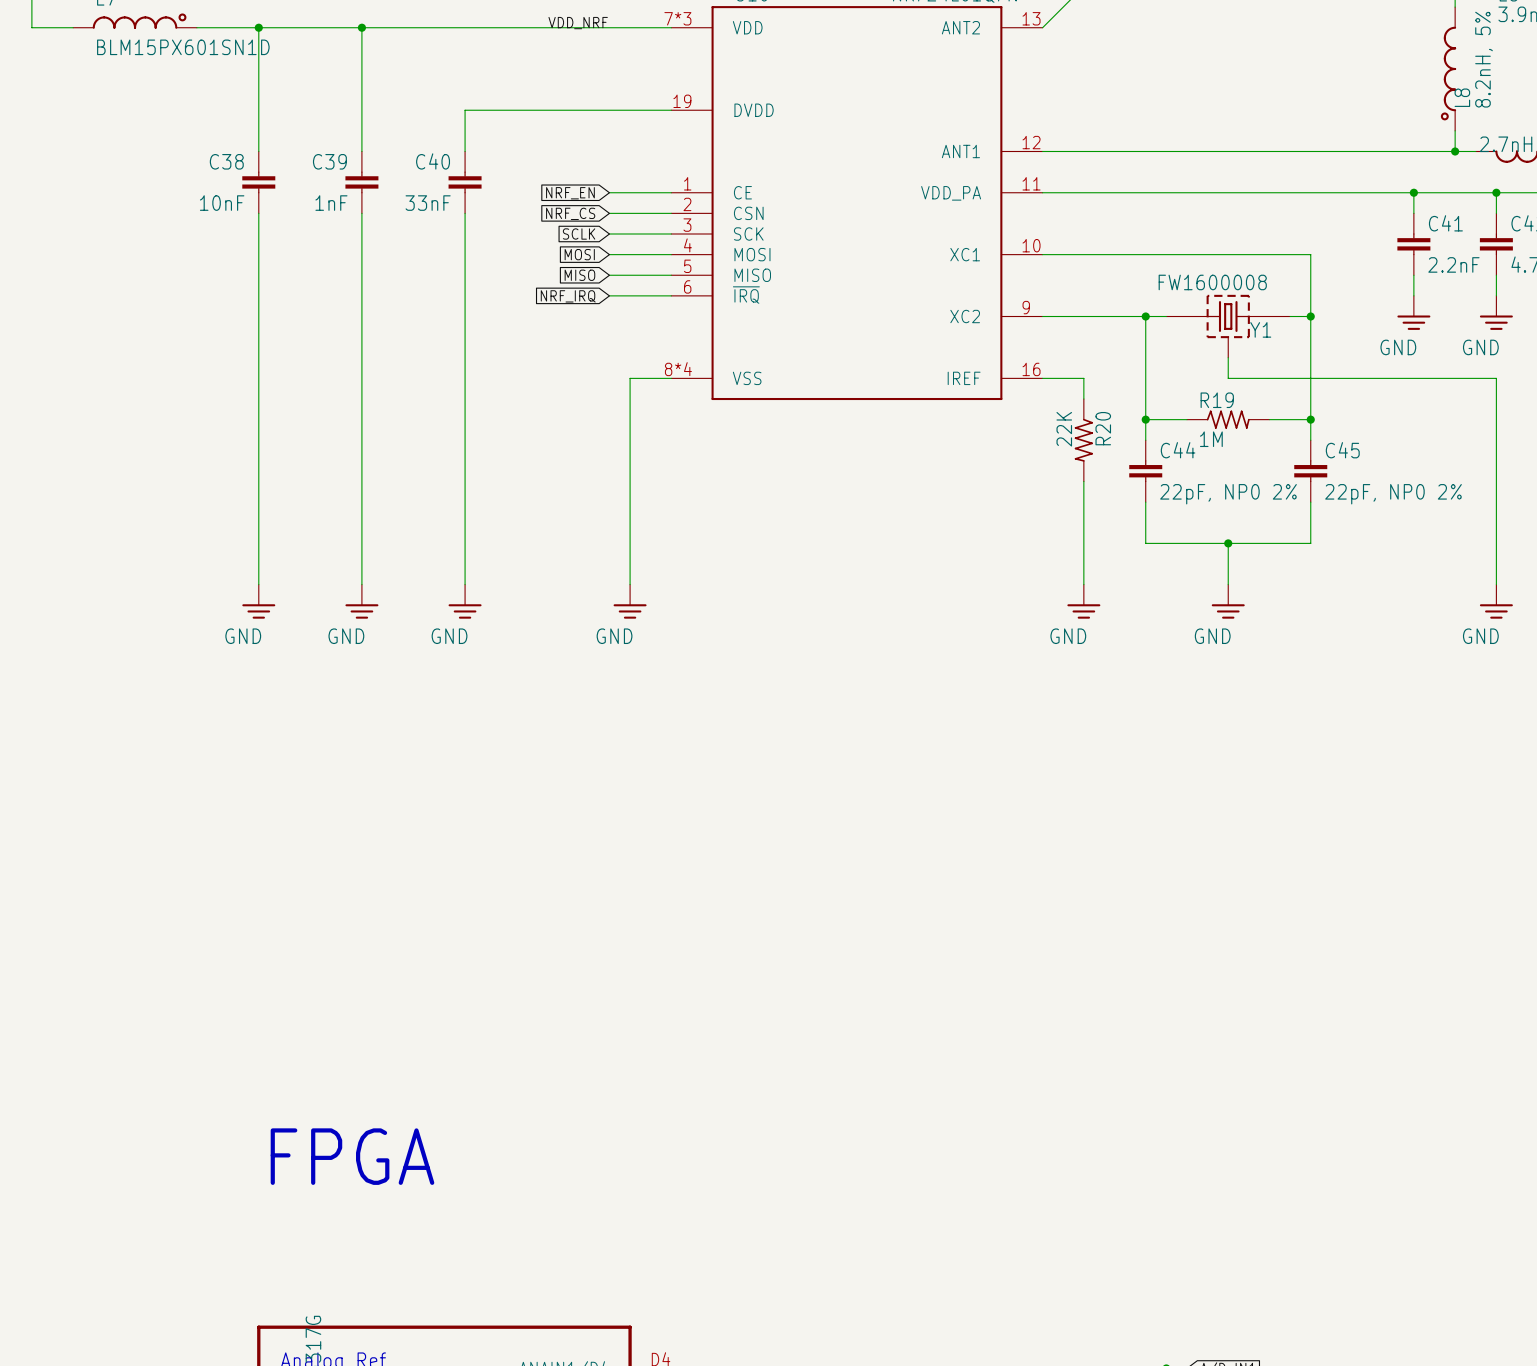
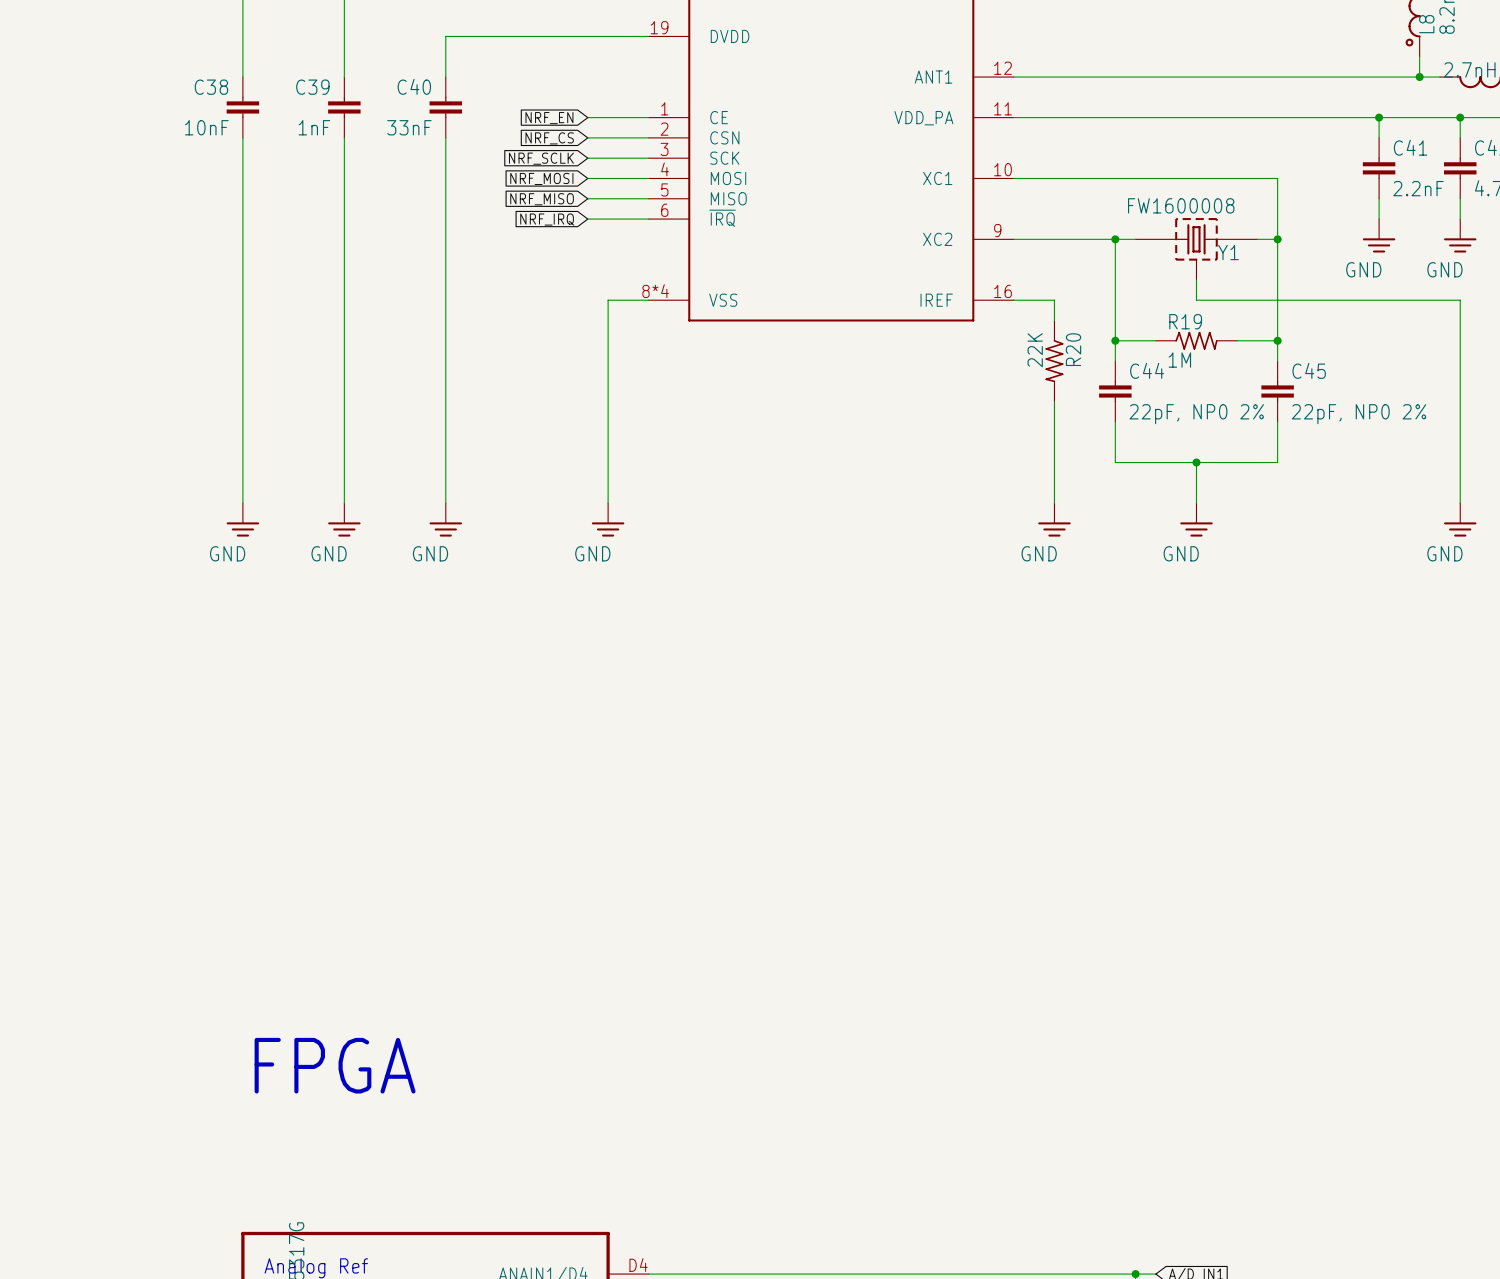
global label: SCLK (579, 234) -> NRF_SCLK (541, 158)
global label: MOSI (579, 254) -> NRF_MOSI (541, 178)
global label: MISO (579, 275) -> NRF_MISO (542, 199)

